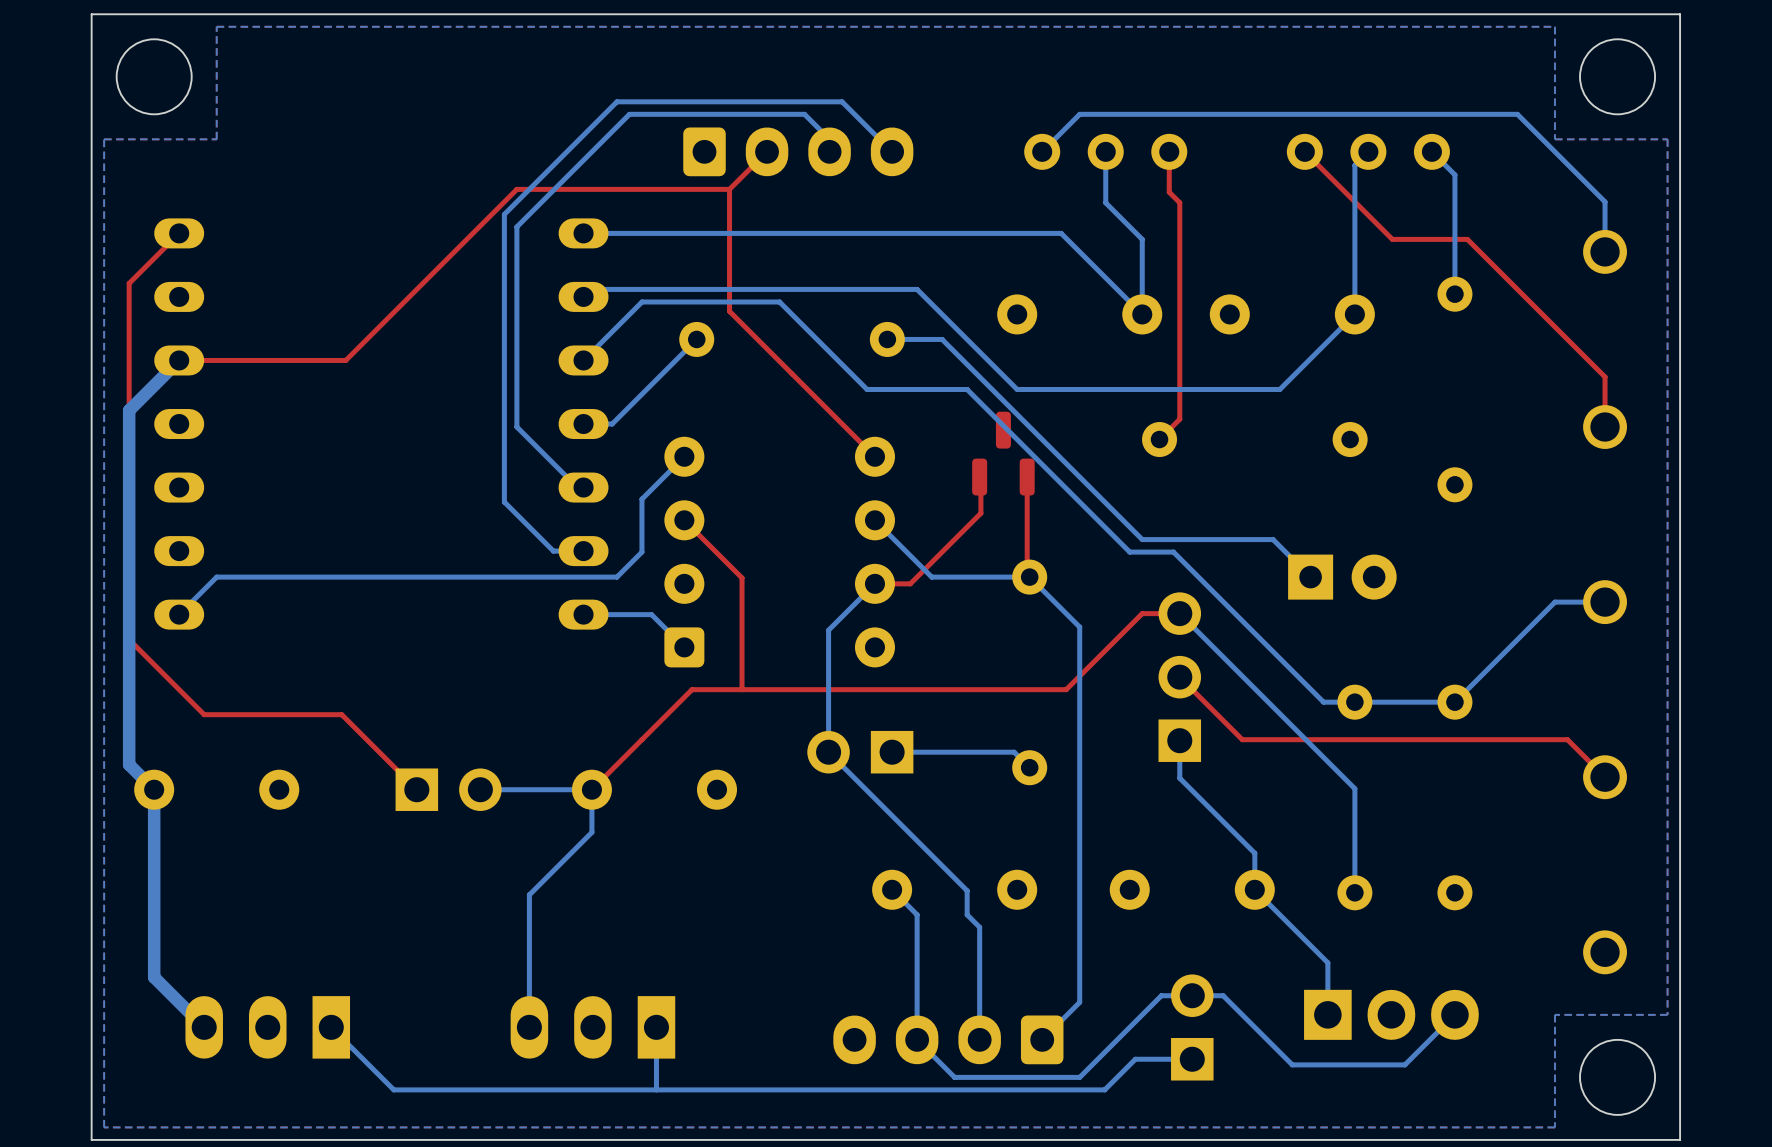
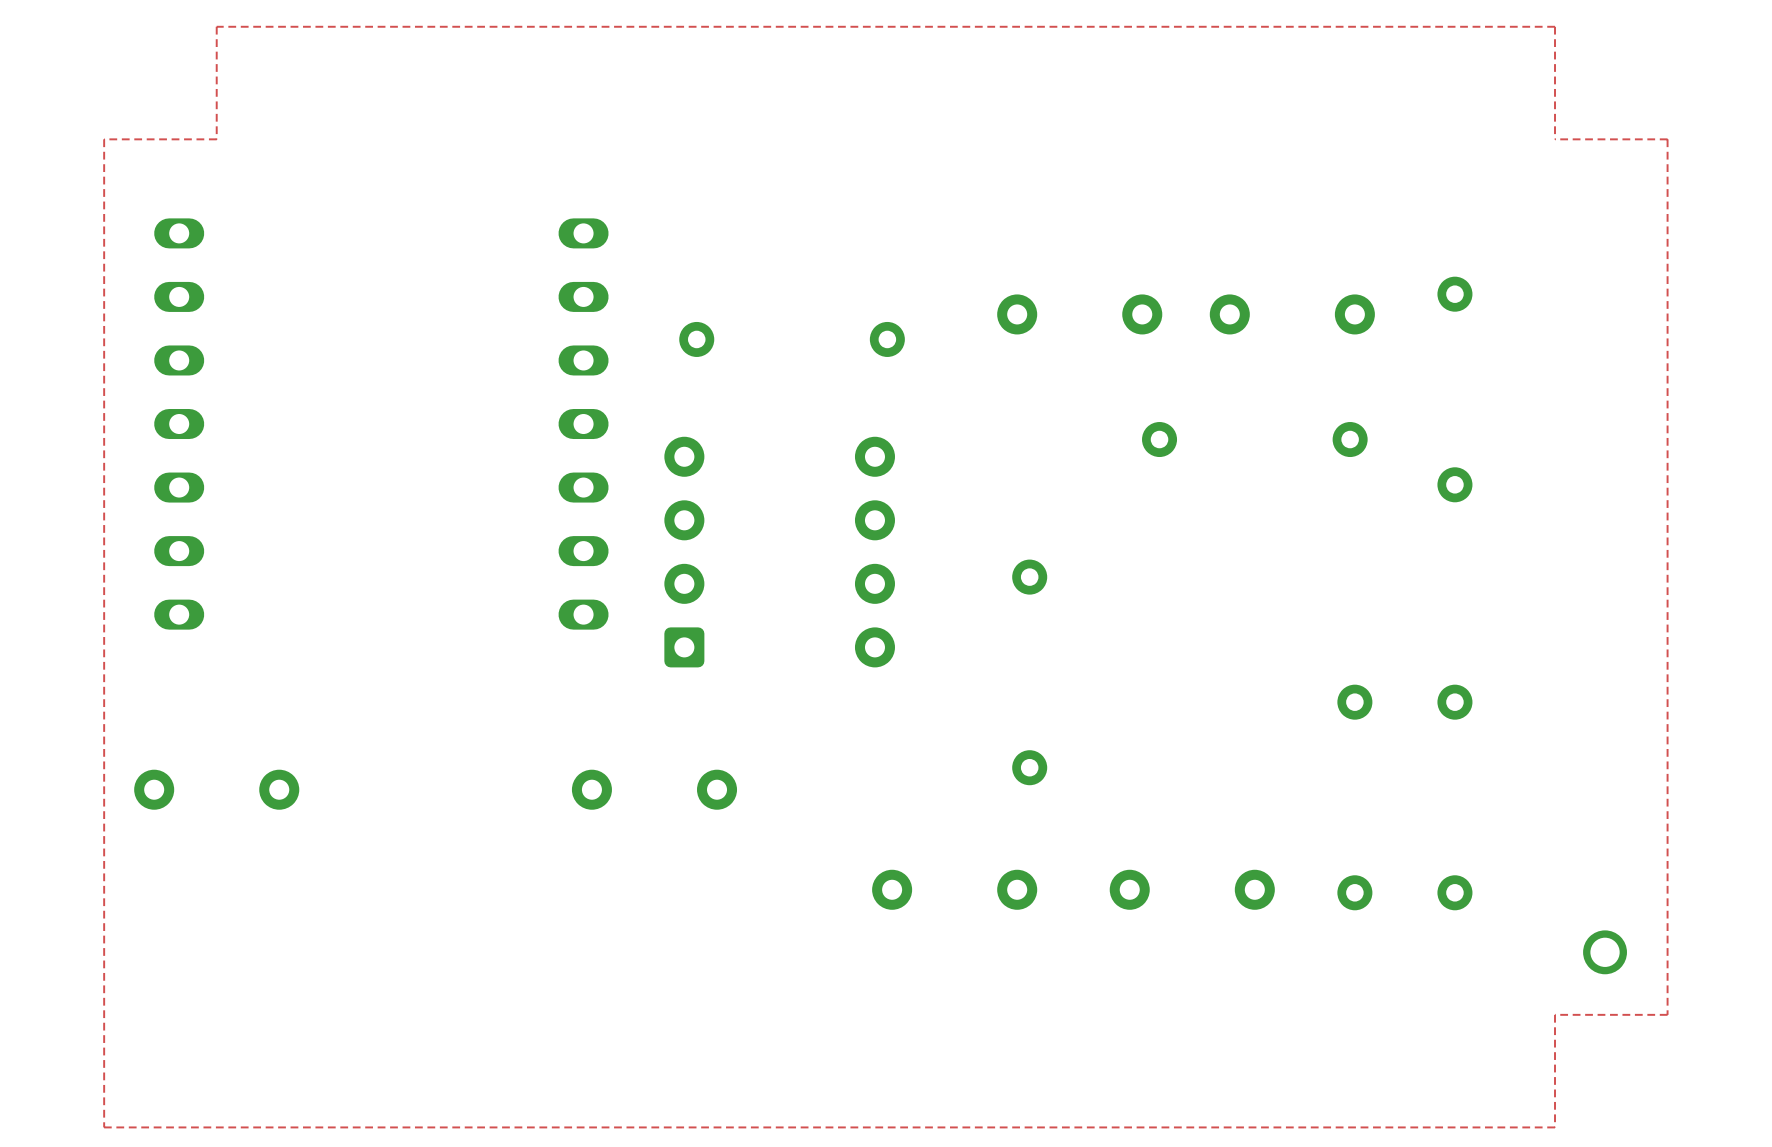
board edge: (1680, 14) (91, 14) (91, 1139) (1680, 1139) (1680, 14) -> none
bottom zone outline: (1555, 26) (216, 26) (216, 139) (104, 139) (104, 1127) (1555, 1127) (1555, 1014) (1667, 1014) (1667, 139) (1555, 139) (1555, 26) -> none
round board edge: [116, 38, 193, 115] -> none
round board edge: [1579, 38, 1656, 115] -> none
top track: (767, 151) (729, 189) -> none
part: (798, 151) -> none
bottom track: (829, 151) (829, 139) (804, 114) (629, 114) (516, 226) (516, 427) (577, 487) (593, 487) -> none
bottom track: (892, 151) (842, 101) (616, 101) (504, 214) (504, 502) (553, 551) (583, 551) -> none
bottom track: (1042, 151) (1079, 114) (1517, 114) (1605, 201) (1605, 251) -> none
bottom track: (1105, 151) (1105, 202) (1142, 239) (1142, 314) (1061, 233) (583, 233) -> none
part: (1105, 151) -> none
top track: (1169, 151) (1169, 192) (1179, 202) (1179, 419) (1159, 439) -> none
top track: (1304, 151) (1392, 239) (1467, 239) (1605, 376) (1605, 427) -> none
bottom track: (1368, 151) (1354, 165) (1354, 314) (1279, 389) (1017, 389) (917, 289) (591, 289) (583, 296) -> none
part: (1368, 151) -> none
bottom track: (1431, 151) (1454, 174) (1454, 294) -> none
top track: (729, 189) (729, 311) (874, 456) -> none
top track: (729, 189) (516, 189) (345, 360) (179, 360) -> none
top track: (179, 233) (129, 283) (129, 639) (204, 714) (341, 714) (416, 789) -> none
part: (1605, 251) -> none
bottom track: (696, 339) (612, 424) (583, 424) -> none
bottom track: (887, 339) (942, 339) (1142, 539) (1273, 539) (1310, 577) -> none
bottom track: (179, 360) (129, 410) (129, 764) (154, 789) (154, 977) (204, 1027) -> none
bottom track: (583, 360) (642, 301) (779, 301) (867, 389) (967, 389) (1129, 552) (1173, 552) (1323, 702) (1454, 702) (1555, 602) (1605, 602) -> none
part: (1605, 427) -> none
part: (1003, 453) -> none
bottom track: (684, 456) (641, 499) (641, 552) (616, 577) (216, 577) (179, 614) -> none
top track: (980, 477) (980, 513) (910, 583) (874, 583) -> none
top track: (1027, 477) (1027, 574) (1029, 577) -> none
top track: (684, 520) (742, 577) (742, 689) -> none
bottom track: (874, 520) (931, 577) (1029, 577) (1079, 627) (1079, 1002) (1042, 1039) -> none
part: (1342, 577) -> none
bottom track: (874, 583) (828, 630) (828, 752) (967, 890) (967, 914) (979, 927) (979, 1039) -> none
part: (1605, 602) -> none
bottom track: (1179, 613) (1354, 788) (1354, 892) -> none
top track: (1179, 613) (1142, 613) (1066, 689) (691, 689) (591, 789) -> none
bottom track: (583, 614) (651, 614) (684, 647) -> none
top track: (1179, 677) (1242, 739) (1567, 739) (1605, 777) -> none
part: (1179, 677) -> none
bottom track: (1179, 740) (1179, 778) (1254, 853) (1254, 889) (1327, 962) (1327, 1014) -> none
part: (860, 752) -> none
bottom track: (892, 752) (1014, 752) (1029, 767) -> none
part: (1605, 777) -> none
part: (448, 789) -> none
bottom track: (480, 789) (591, 789) (591, 832) (529, 894) (529, 1027) -> none
bottom track: (892, 889) (917, 914) (917, 1039) (954, 1077) (1079, 1077) (1161, 995) (1223, 995) (1292, 1064) (1404, 1064) (1454, 1014) -> none
part: (1391, 1014) -> none
part: (267, 1027) -> none
bottom track: (331, 1027) (393, 1089) (1104, 1089) (1135, 1059) (1192, 1059) -> none
part: (592, 1027) -> none
bottom track: (656, 1027) (656, 1089) -> none
part: (1192, 1027) -> none
part: (948, 1039) -> none
round board edge: [1579, 1039, 1656, 1116] -> none

